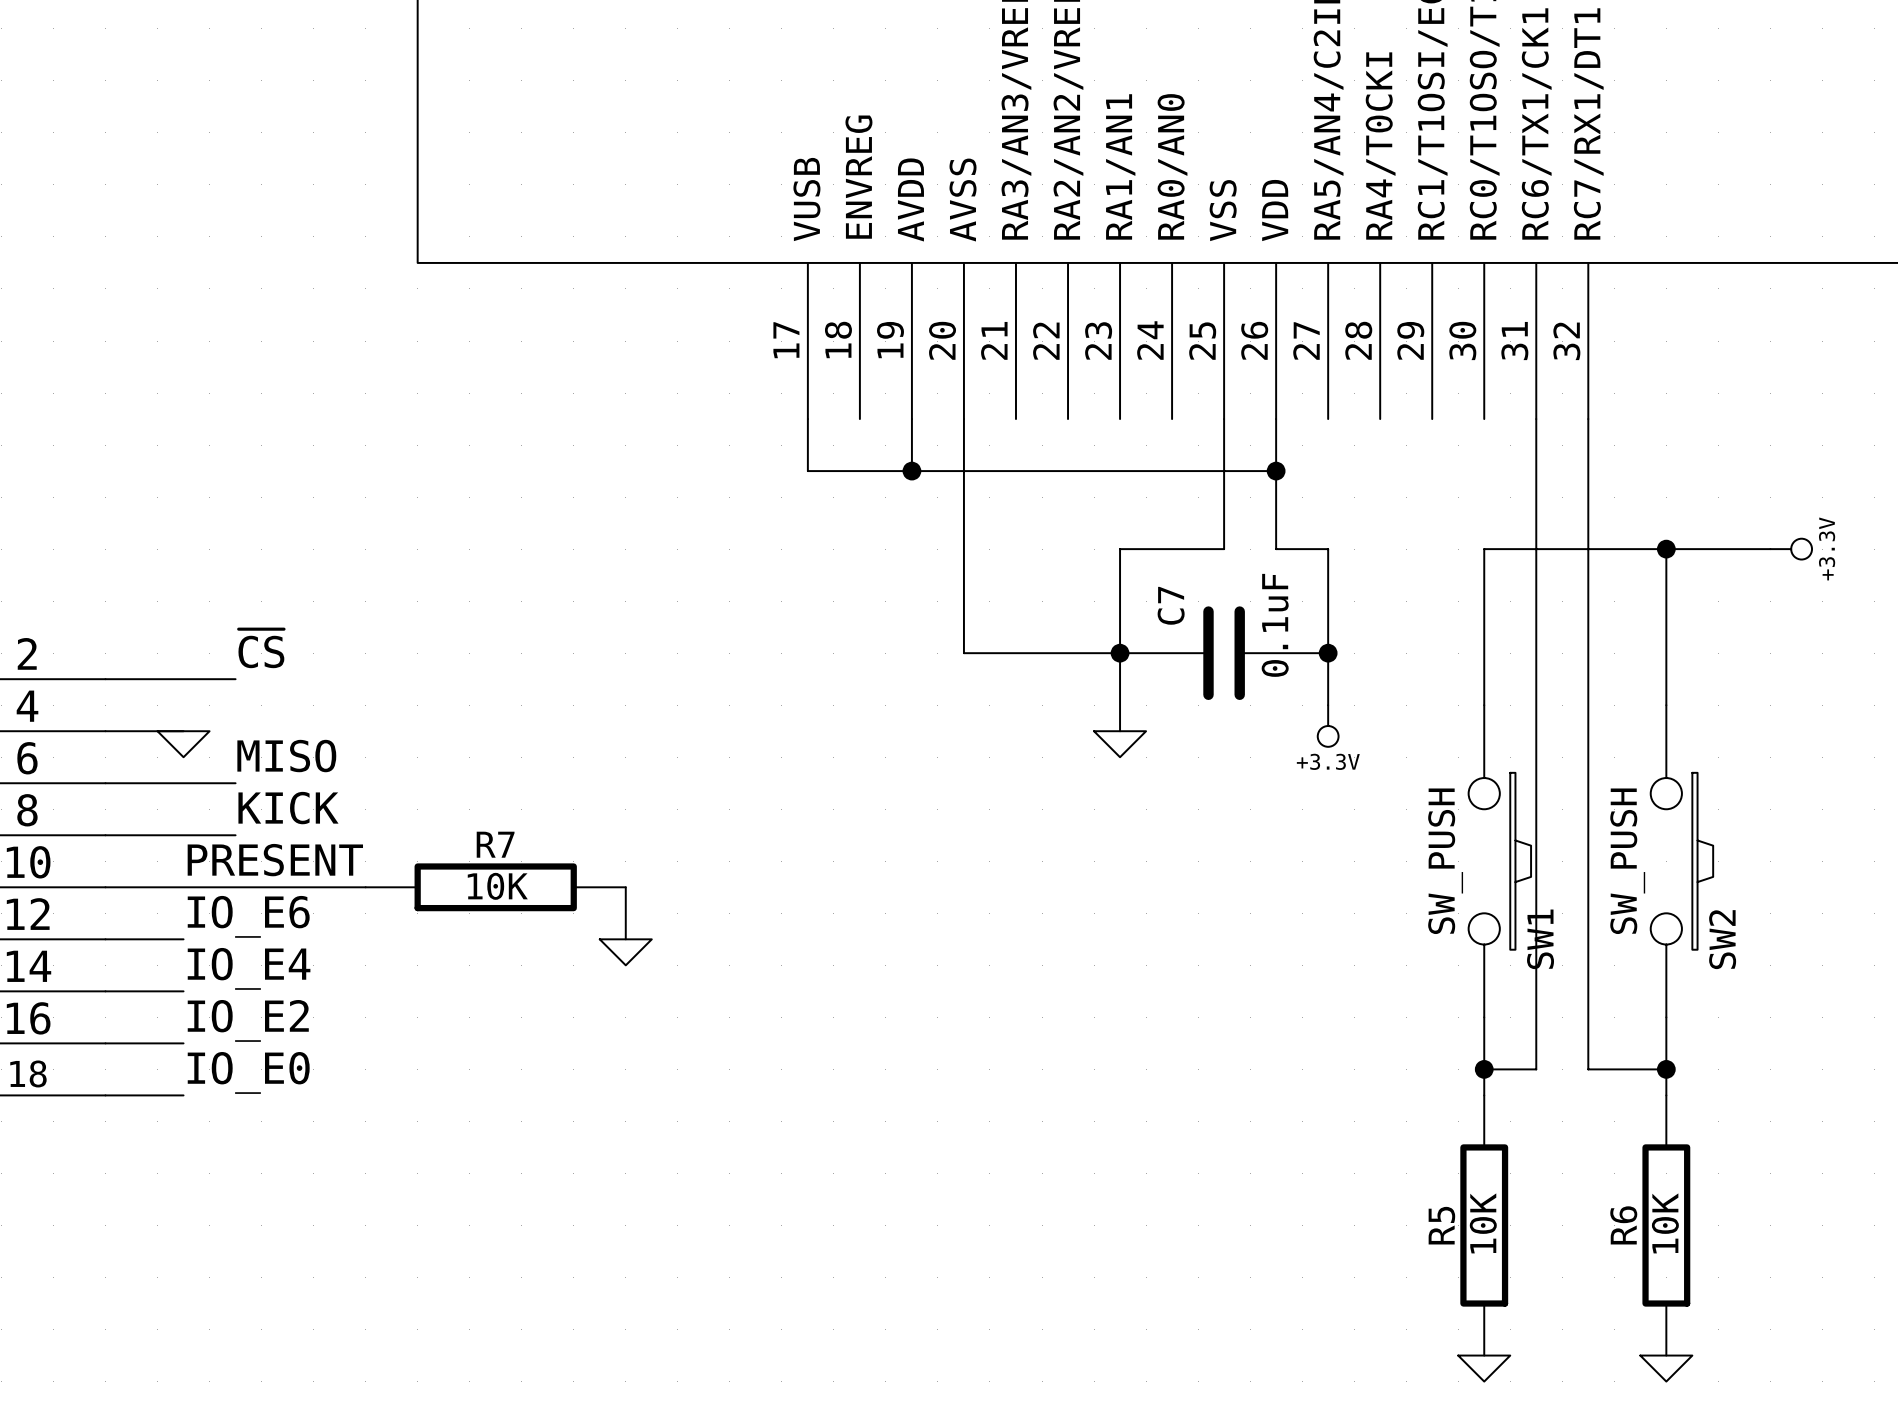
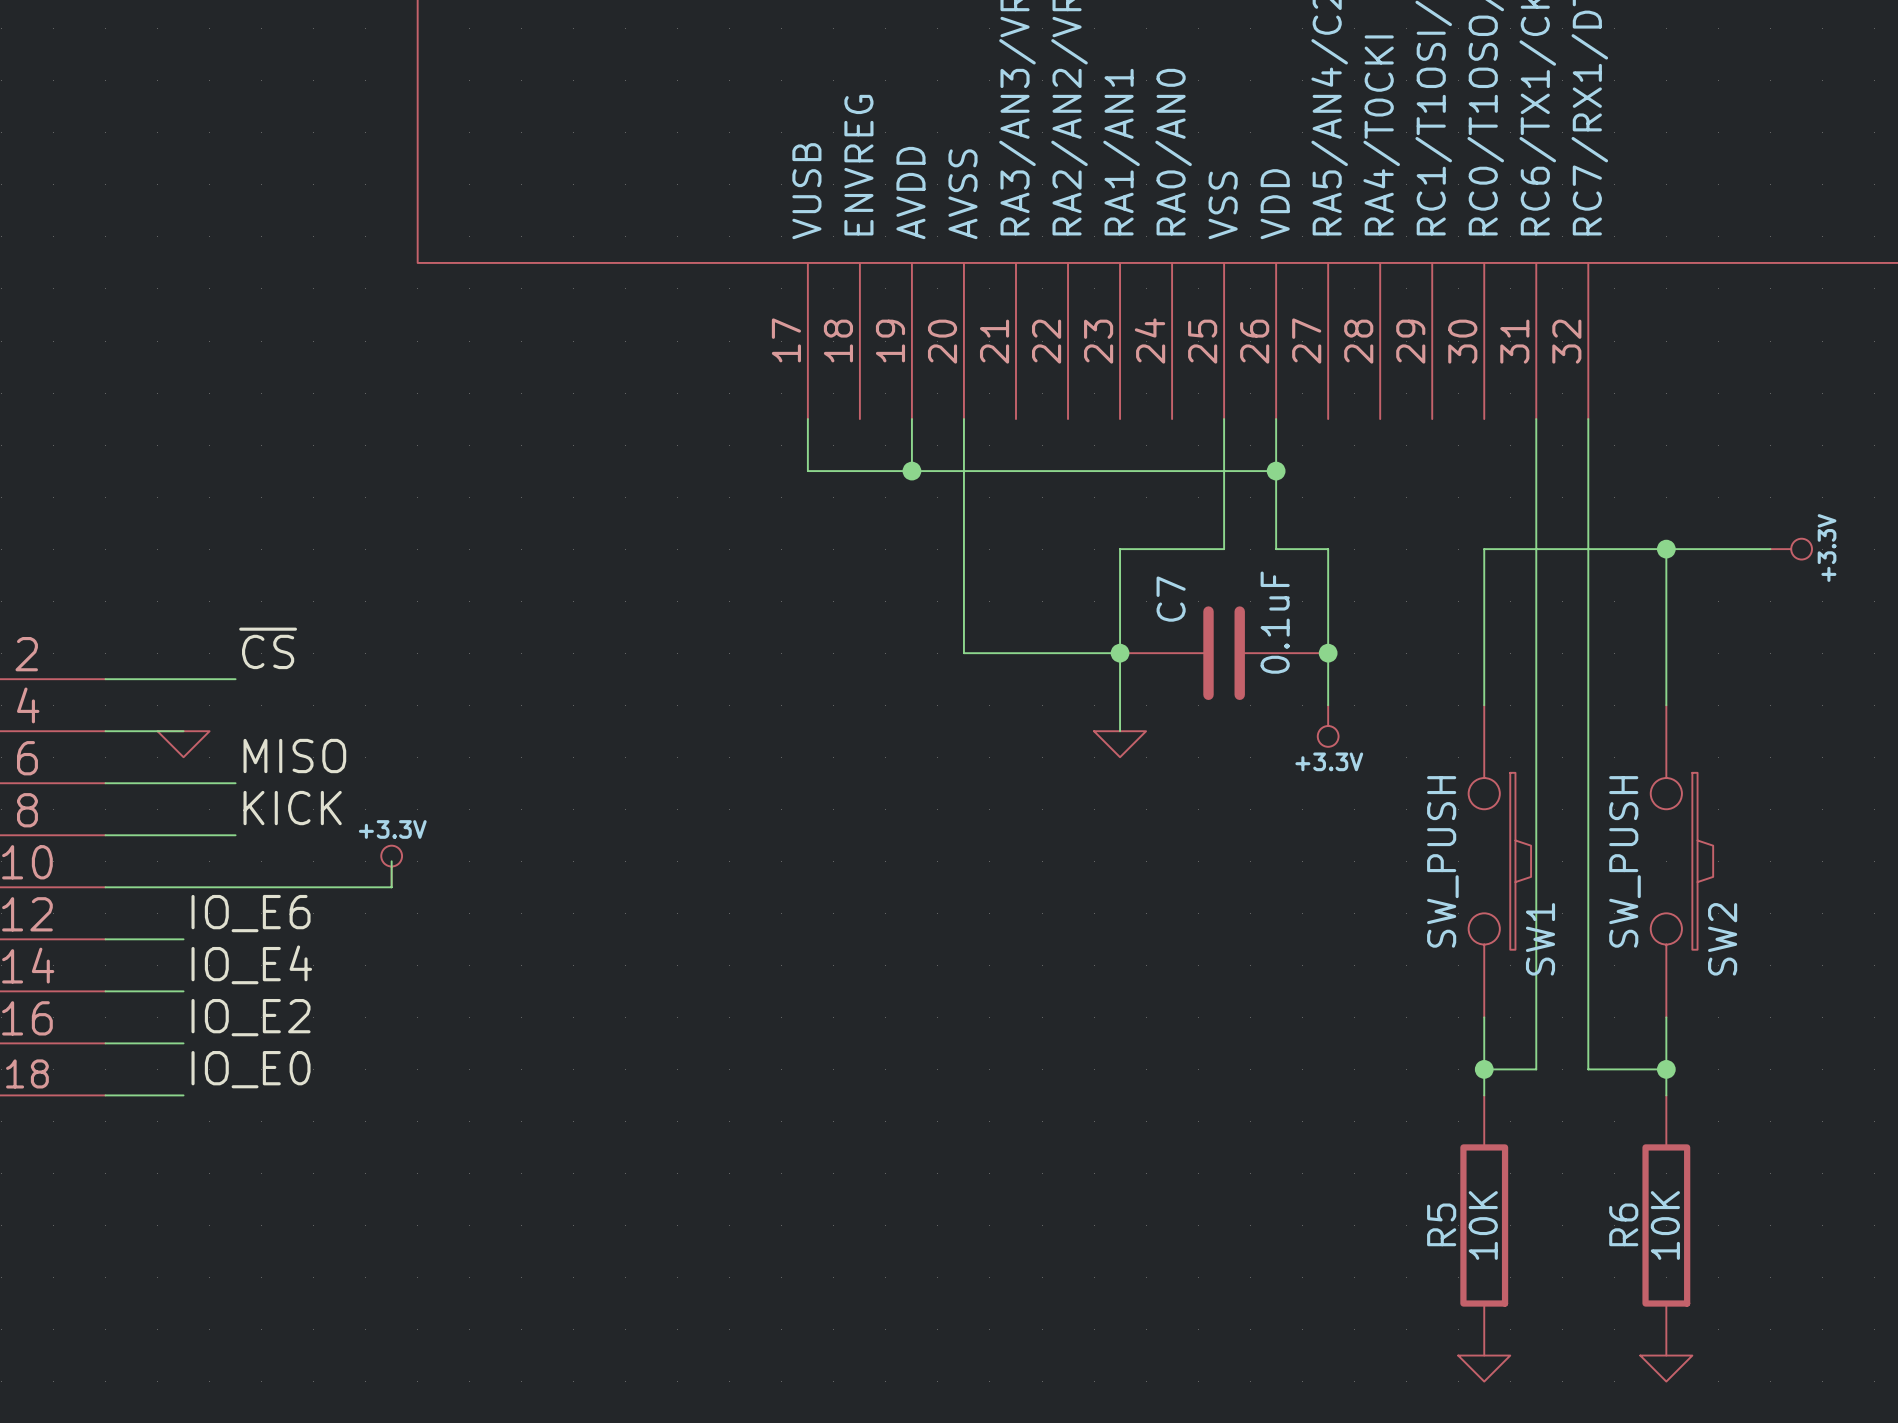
label: PRESENT (275, 860) -> none
wire: none -> (391, 861) (391, 887) (365, 887)
power symbol: none -> +3.3V (391, 866)
R7: 10K (495, 887) -> none
wire: (625, 887) (625, 939) -> none
power symbol: (625, 952) -> none

